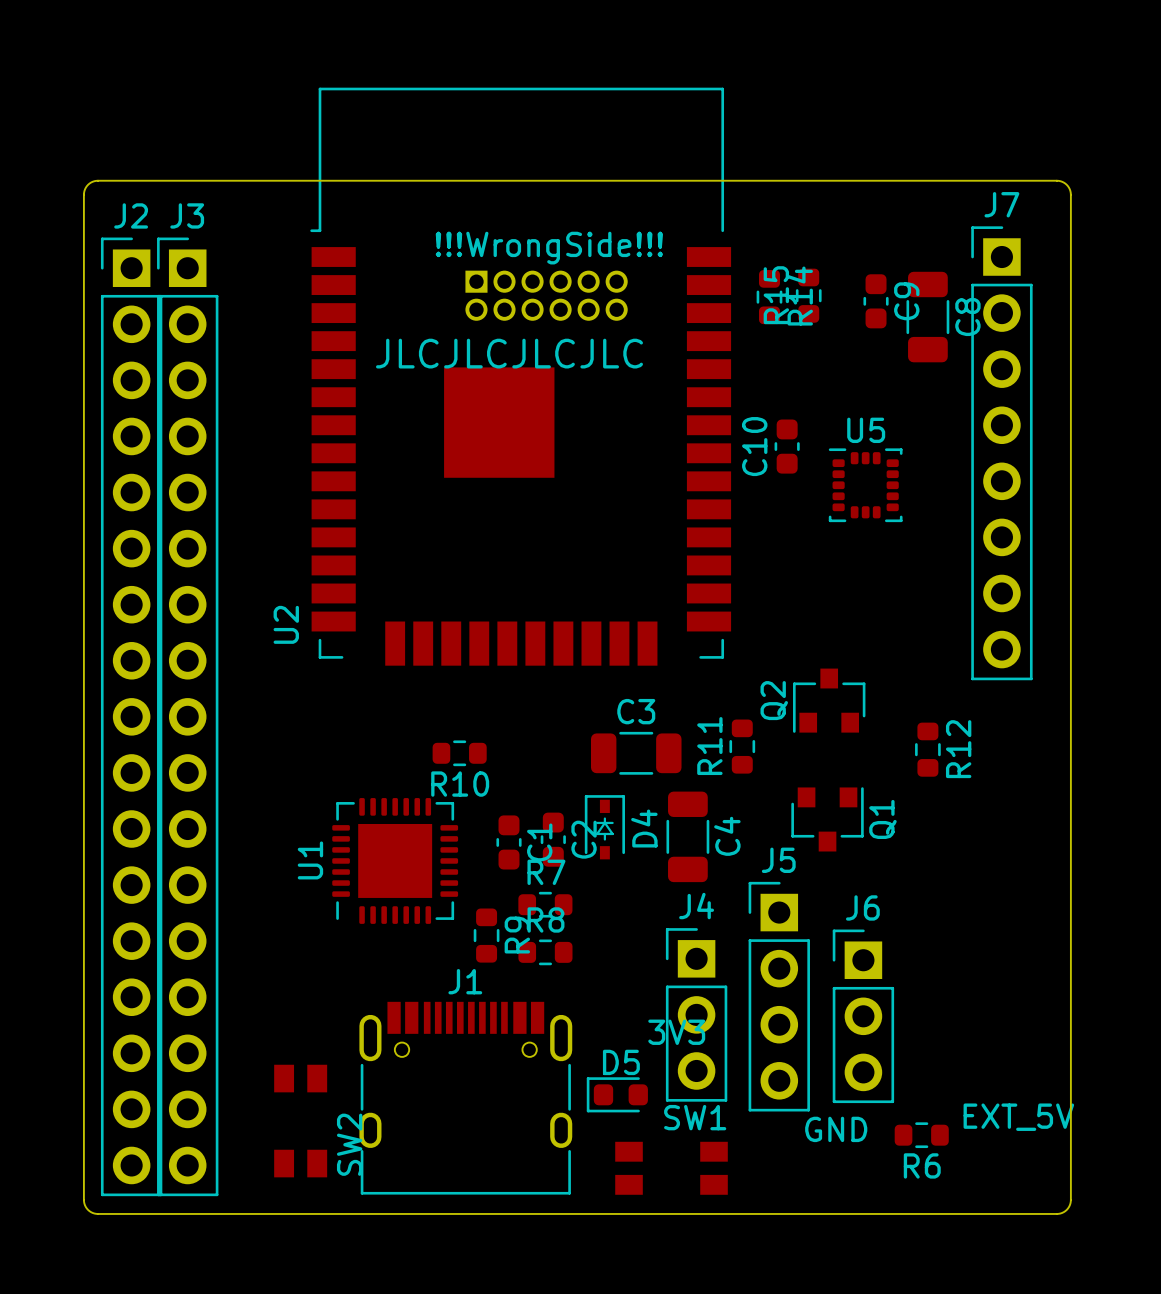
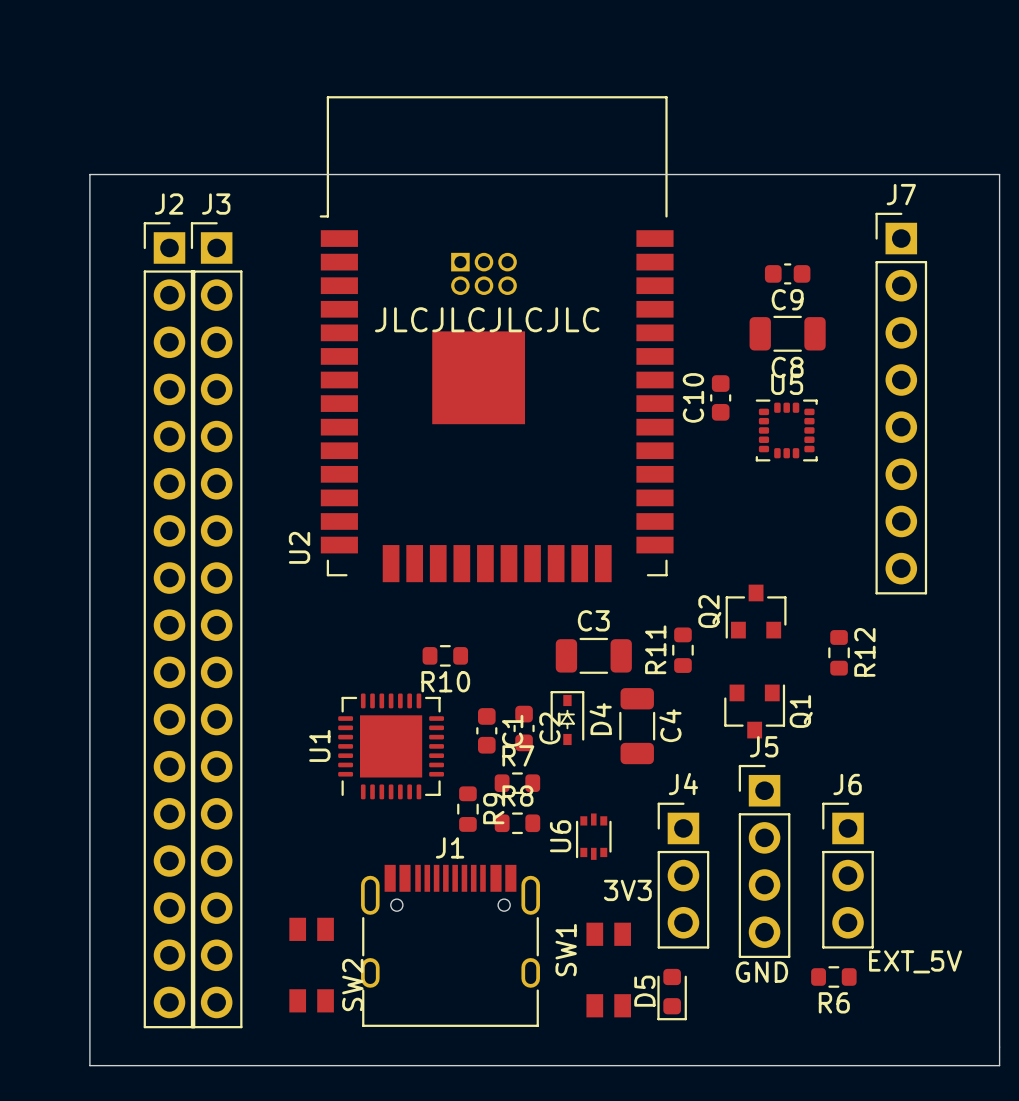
board edge: (97, 180) (1056, 180) (1066, 184) (1070, 194) (1070, 1199) (1066, 1209) (1056, 1213) (97, 1213) (88, 1209) (83, 1199) (83, 194) (88, 184) (97, 180) -> (89, 174) (89, 1065) (999, 1065) (999, 174) (89, 174)
part: (546, 295) -> none
R15: (808, 295) -> none
R14: (769, 297) -> none
part: none -> (483, 273)
C9 rotation: 0° (876, 301) -> 90° clockwise (787, 273)
C8 rotation: 0° (927, 317) -> 90° clockwise (787, 333)
C8 position: (927, 317) -> (787, 333)
U6: none -> (585, 847)
J5 position: (779, 996) -> (764, 861)
J4 position: (696, 1014) -> (683, 875)
J6 position: (863, 1016) -> (848, 875)
D5 rotation: 0° (617, 1094) -> 90° counterclockwise (672, 994)
D5 position: (617, 1094) -> (672, 994)
SW1 name position: SW1 (695, 1117) -> SW1 (566, 950)
SW1 rotation: 0° (671, 1168) -> 90° clockwise (608, 970)

